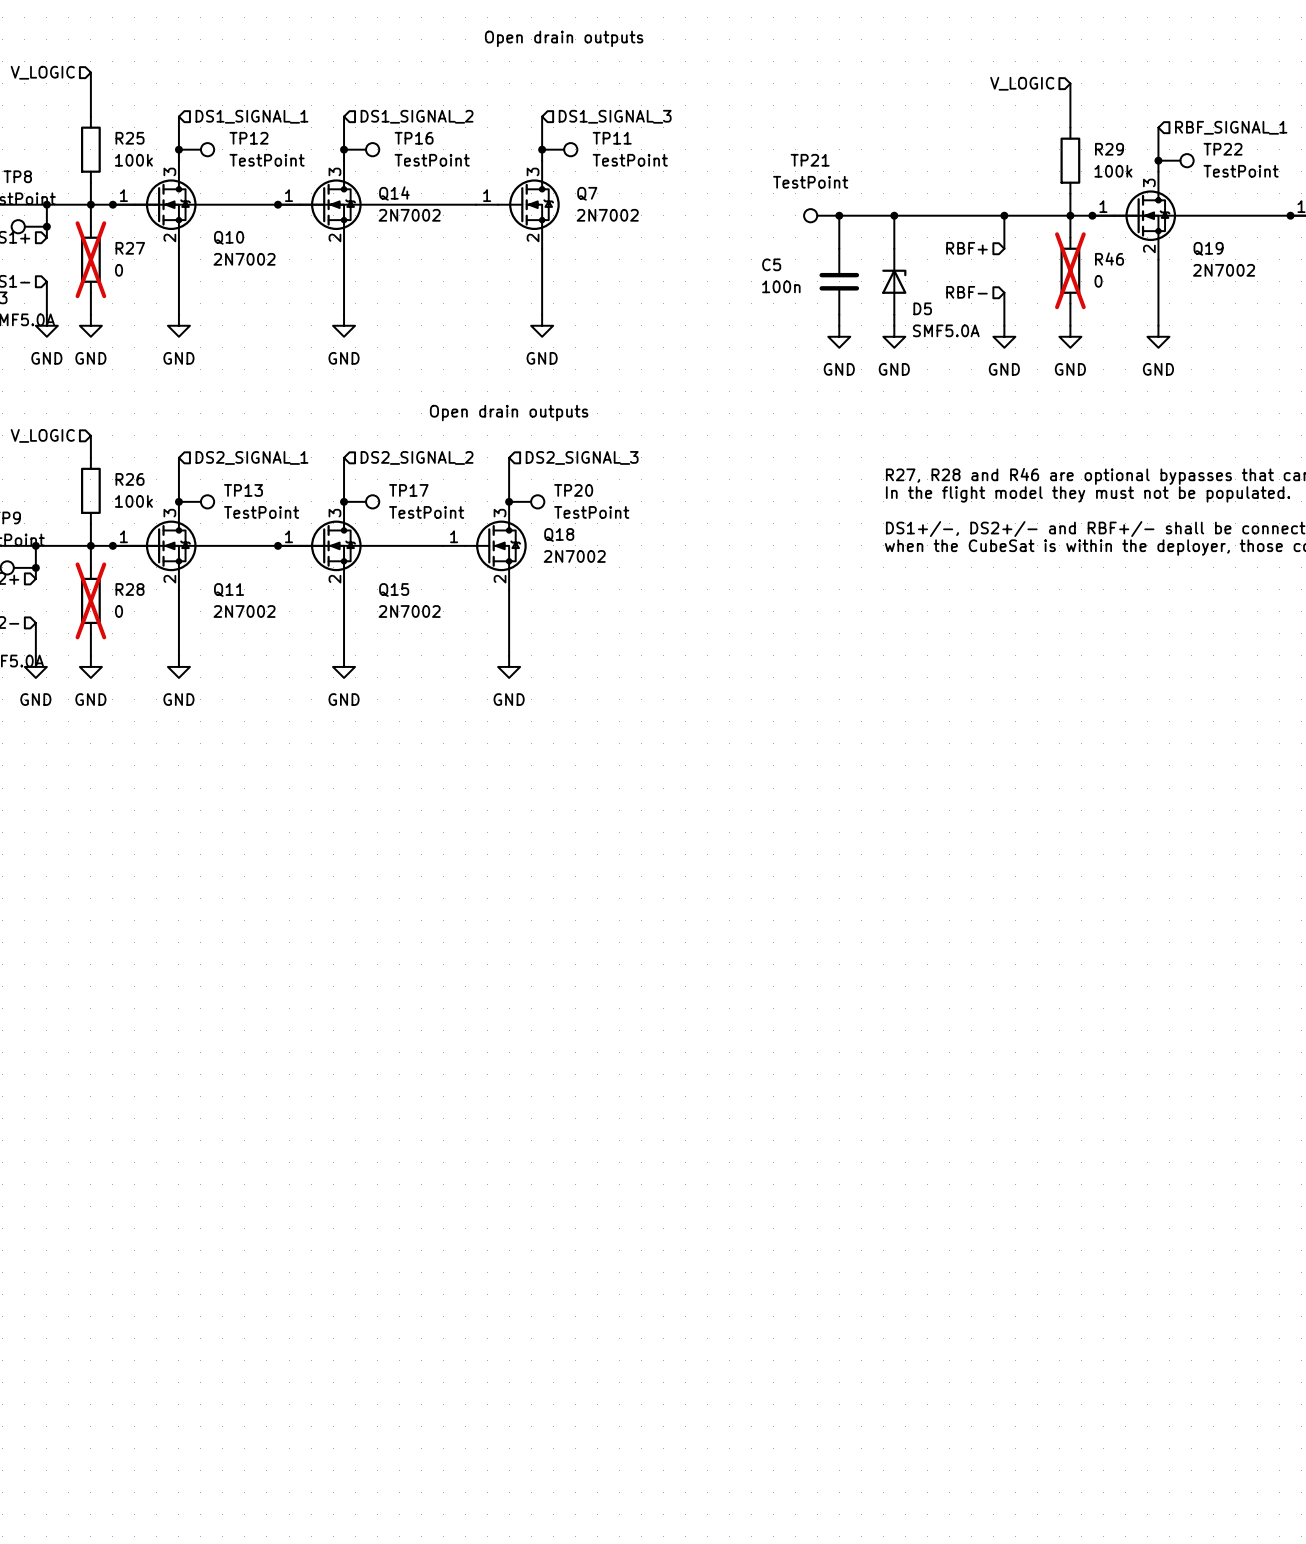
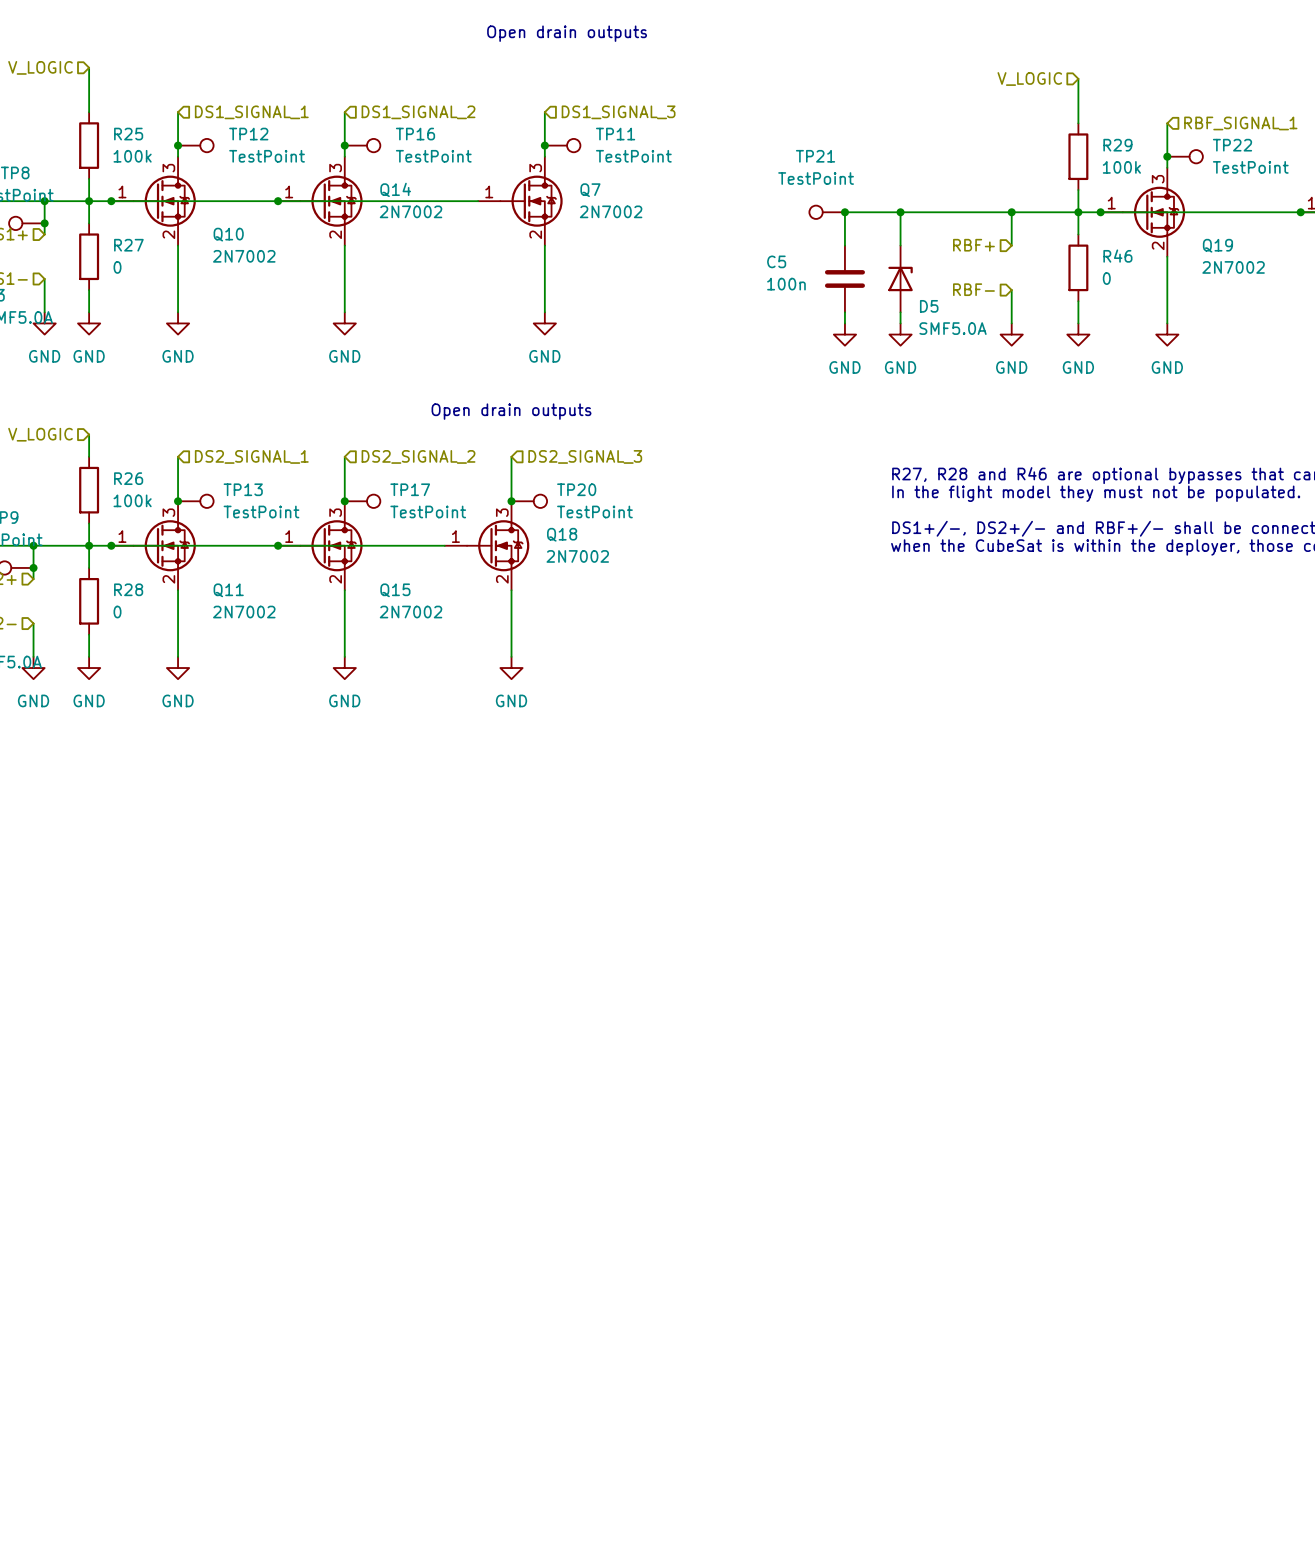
R27 do-not-place cross: (90, 259) -> none
R46 do-not-place cross: (1070, 270) -> none
R28 do-not-place cross: (90, 600) -> none

